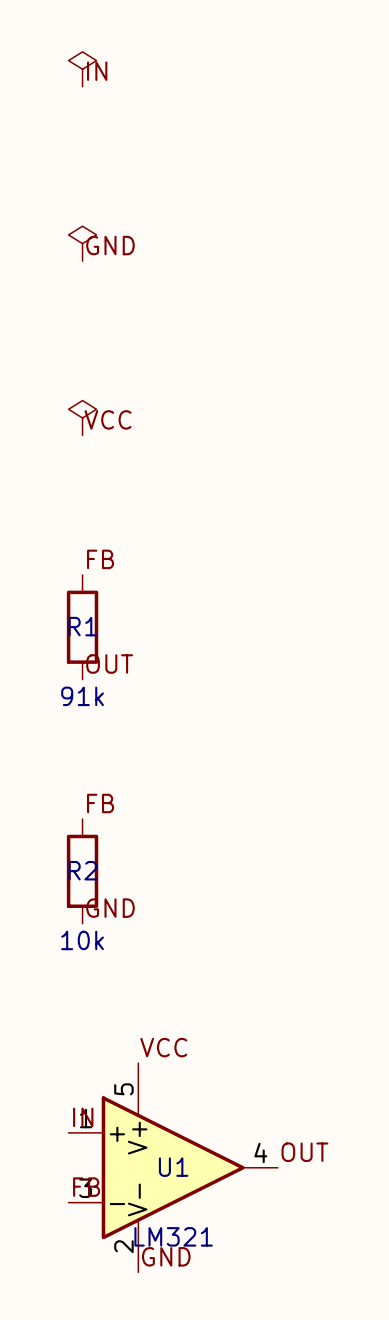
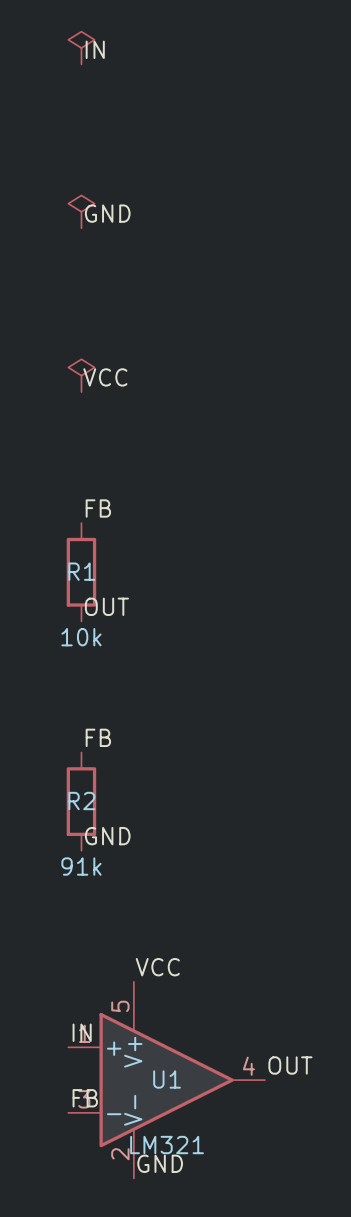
R1 value: 91k (82, 696) -> 10k (81, 637)
R2 value: 10k (82, 940) -> 91k (81, 866)

